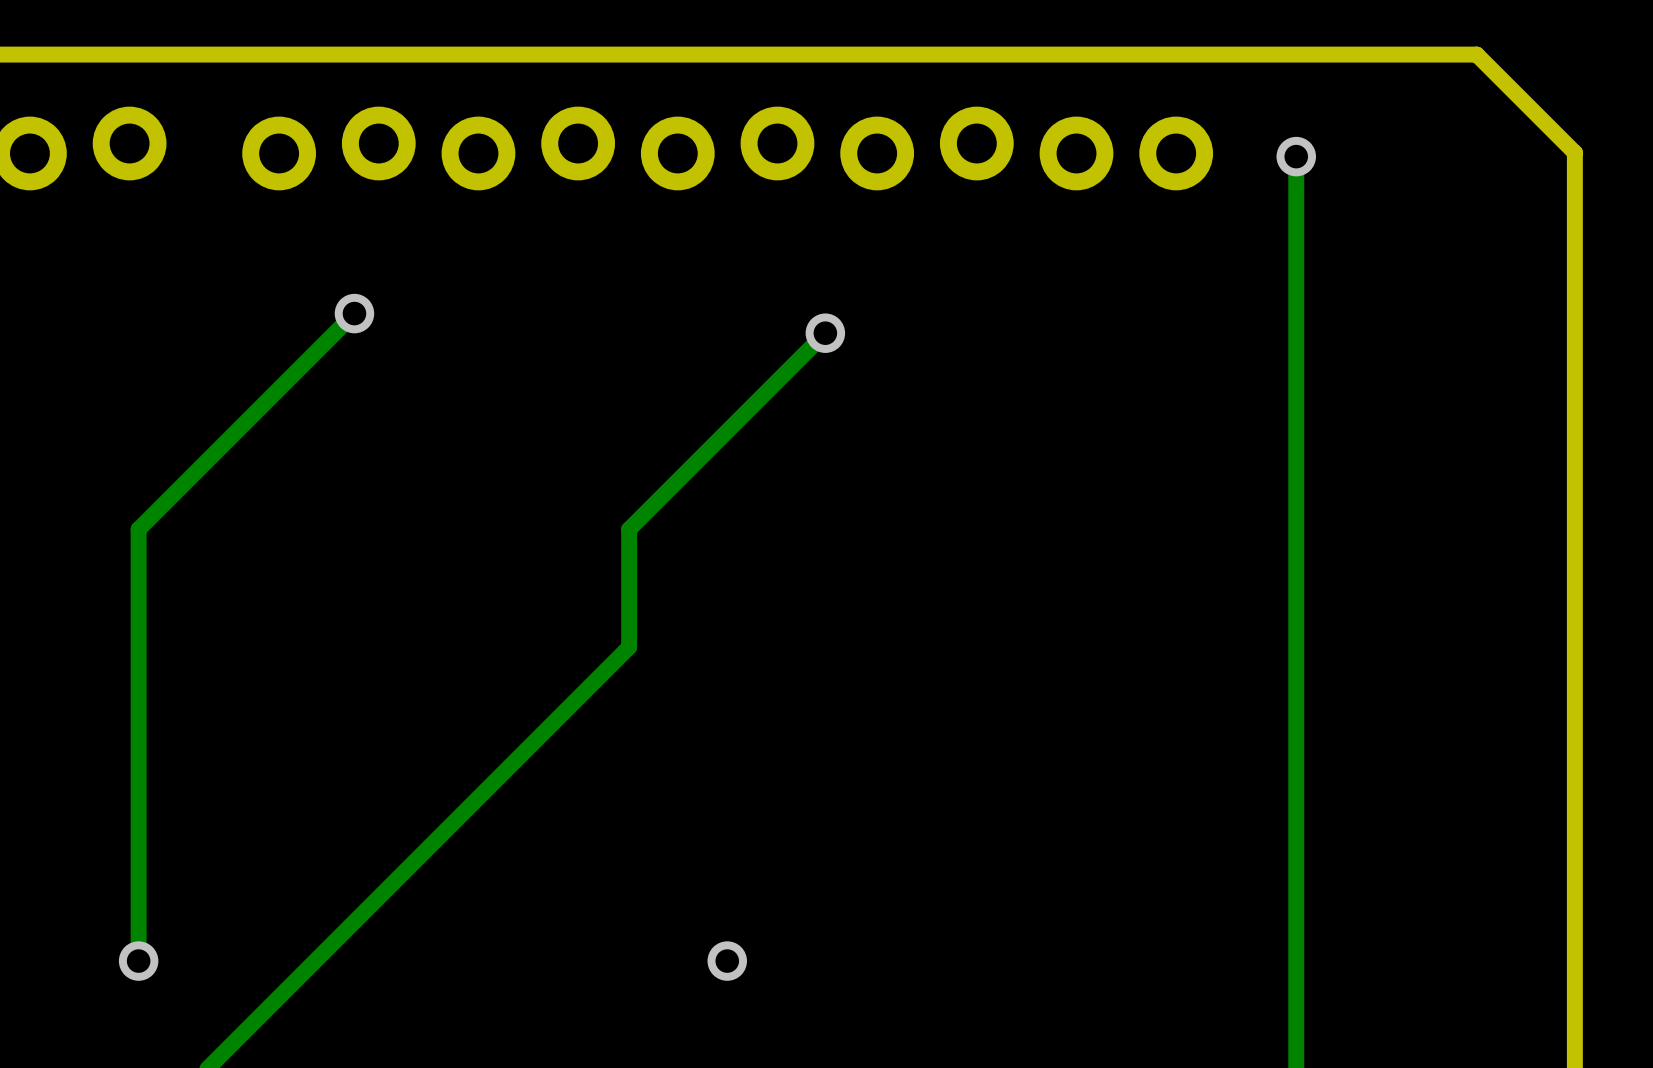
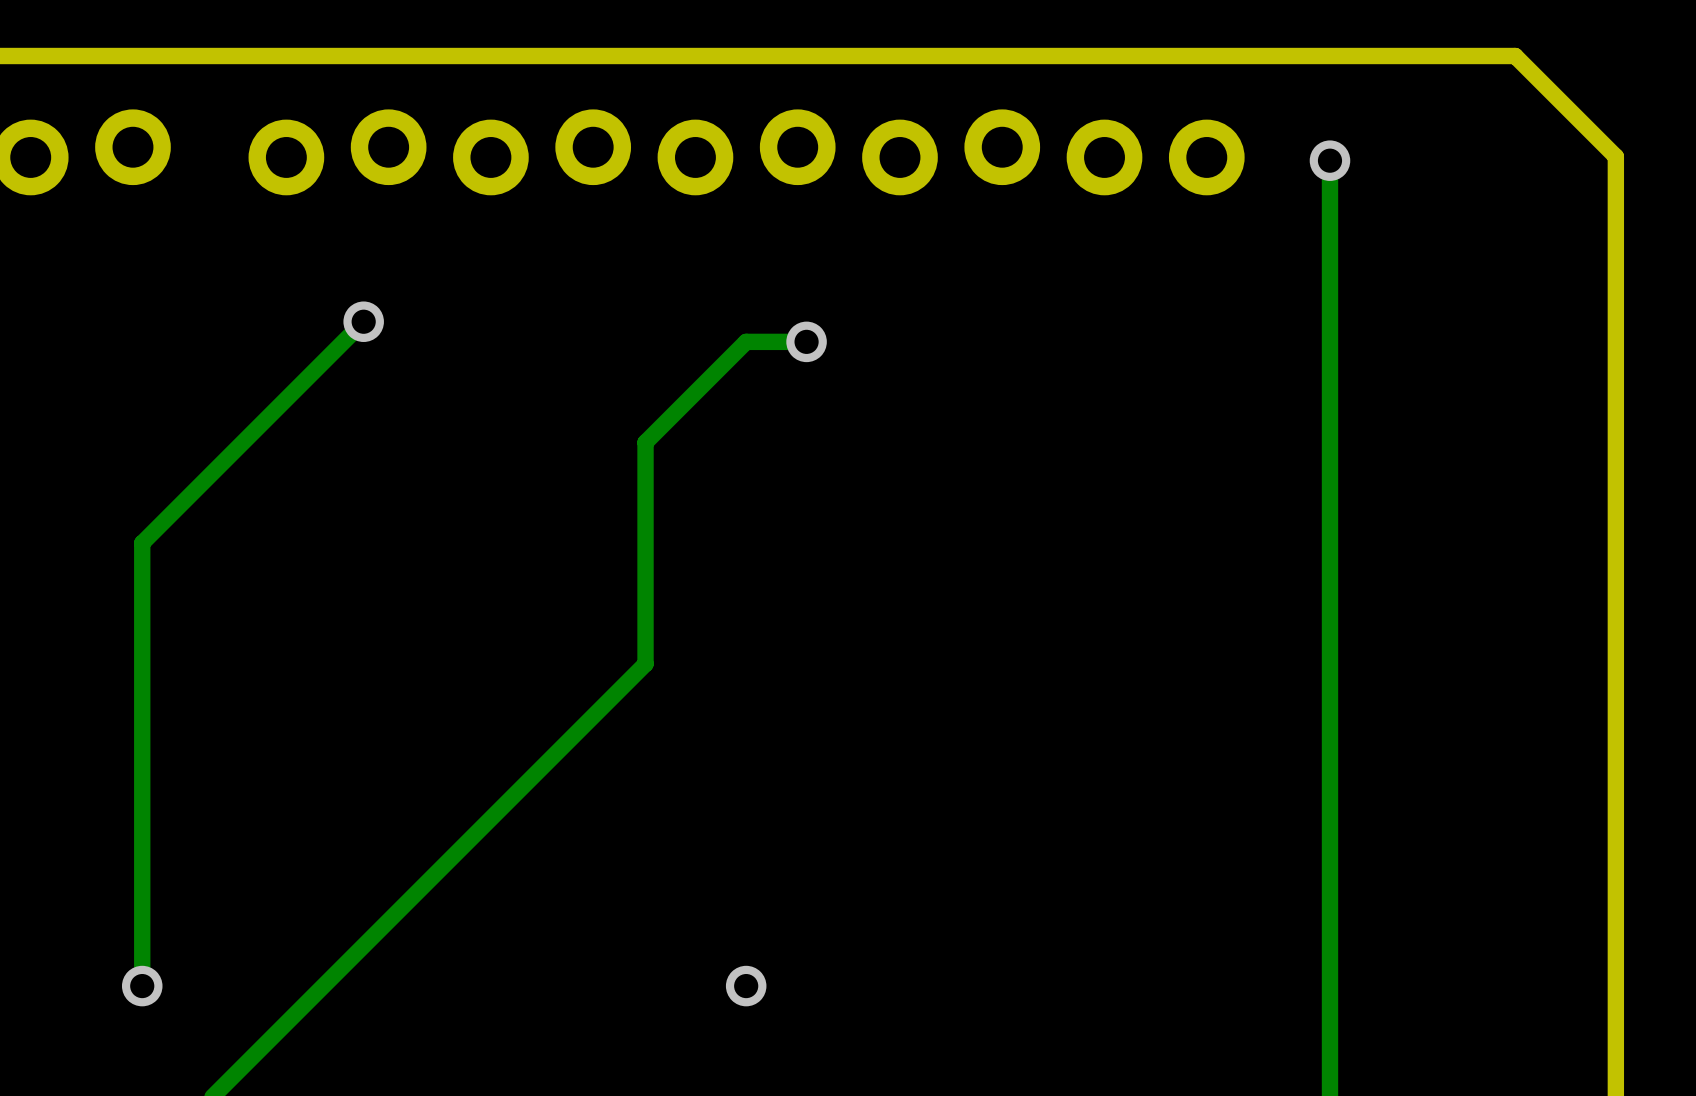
track: (825, 333) (629, 529) -> (806, 341) (746, 341) (645, 442) (645, 543)
via position: (825, 333) -> (806, 341)

